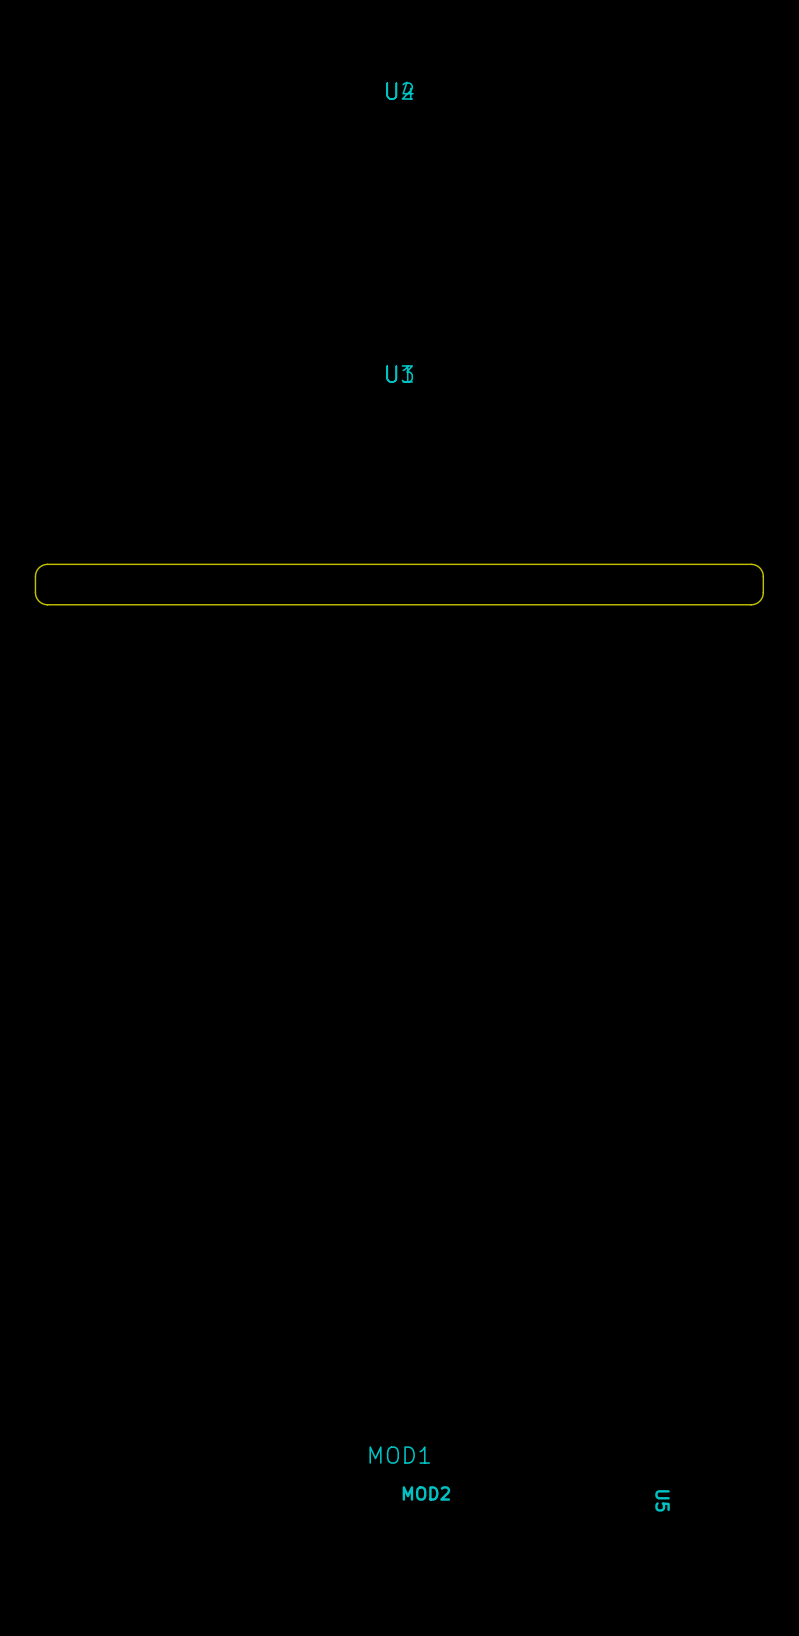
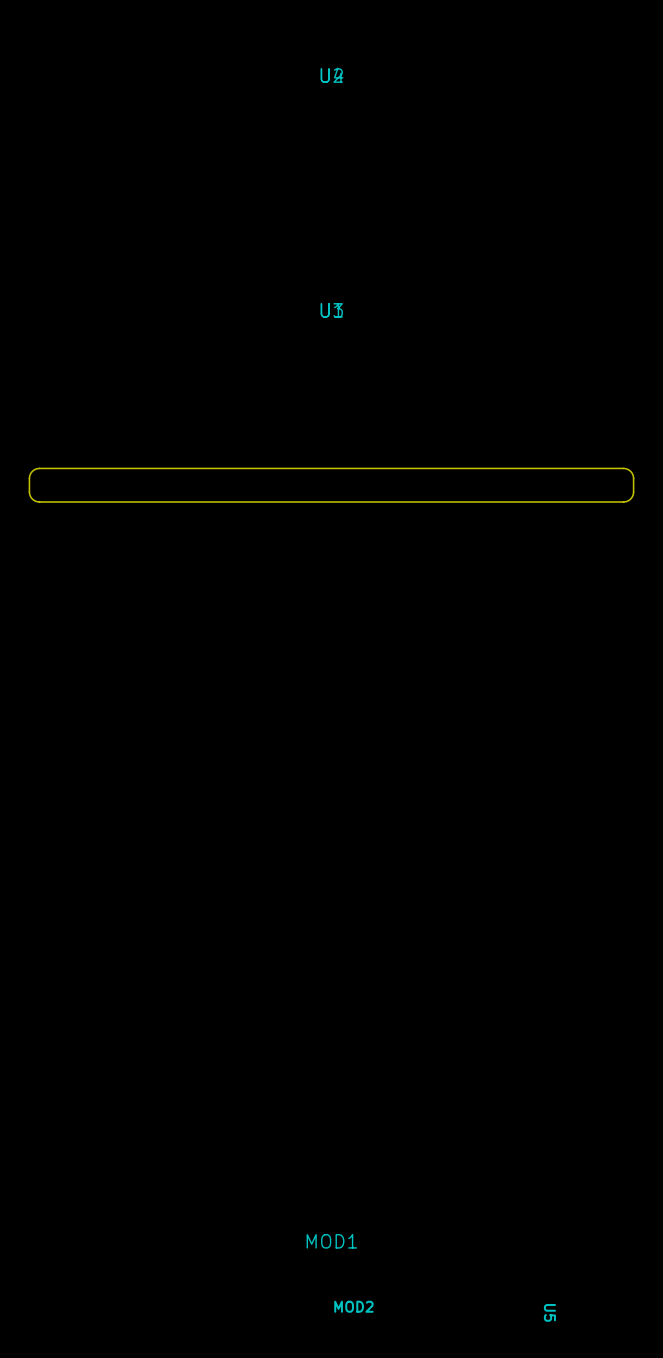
MOD1 position: (399, 1455) -> (331, 1241)
MOD2 position: (426, 1493) -> (353, 1306)
U5 position: (662, 1500) -> (549, 1312)

